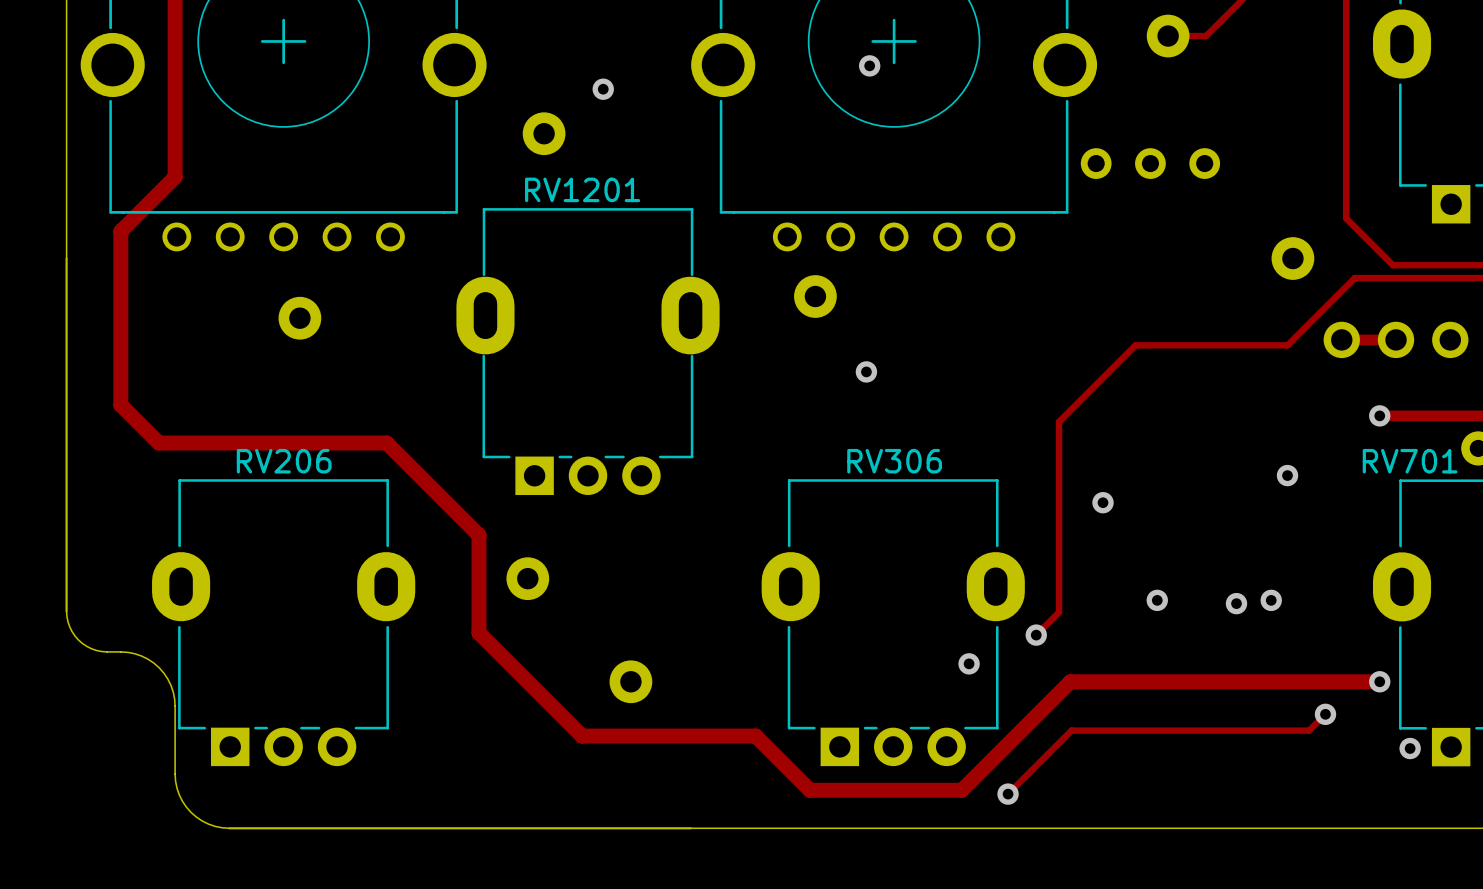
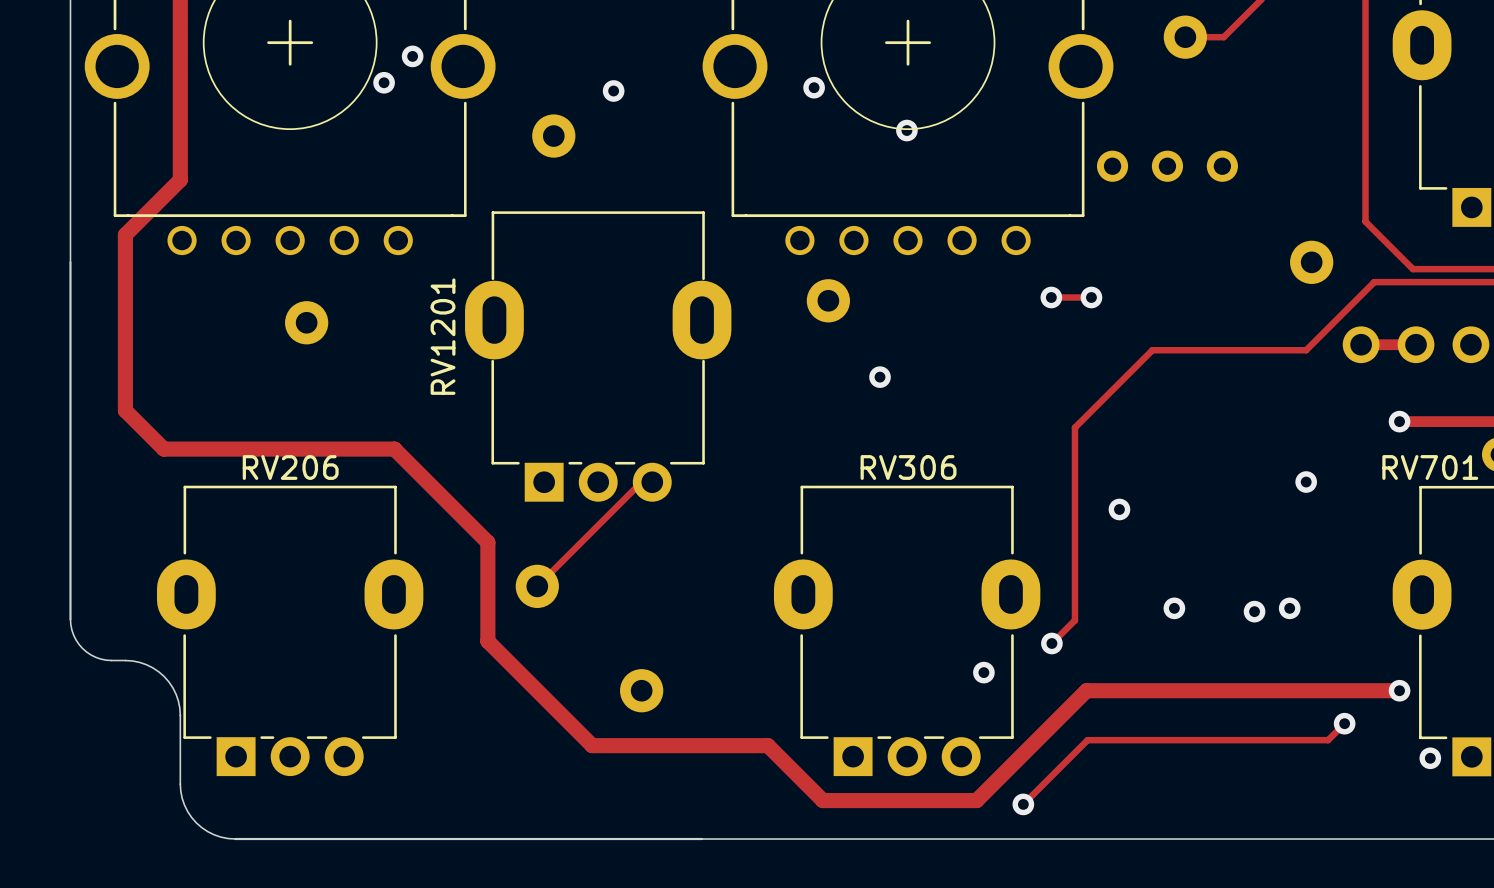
via: none -> (412, 56)
via: (869, 65) -> none
via: none -> (384, 82)
via: none -> (814, 87)
via: none -> (906, 130)
RV1201 name rotation: 0° (582, 189) -> 90° counterclockwise (443, 336)
RV1201 name position: RV1201 (582, 189) -> RV1201 (443, 336)
track: none -> (1051, 297) (1091, 297)
via: none -> (1051, 297)
via: none -> (1091, 297)
track: none -> (652, 482) (641, 482) (537, 586)

